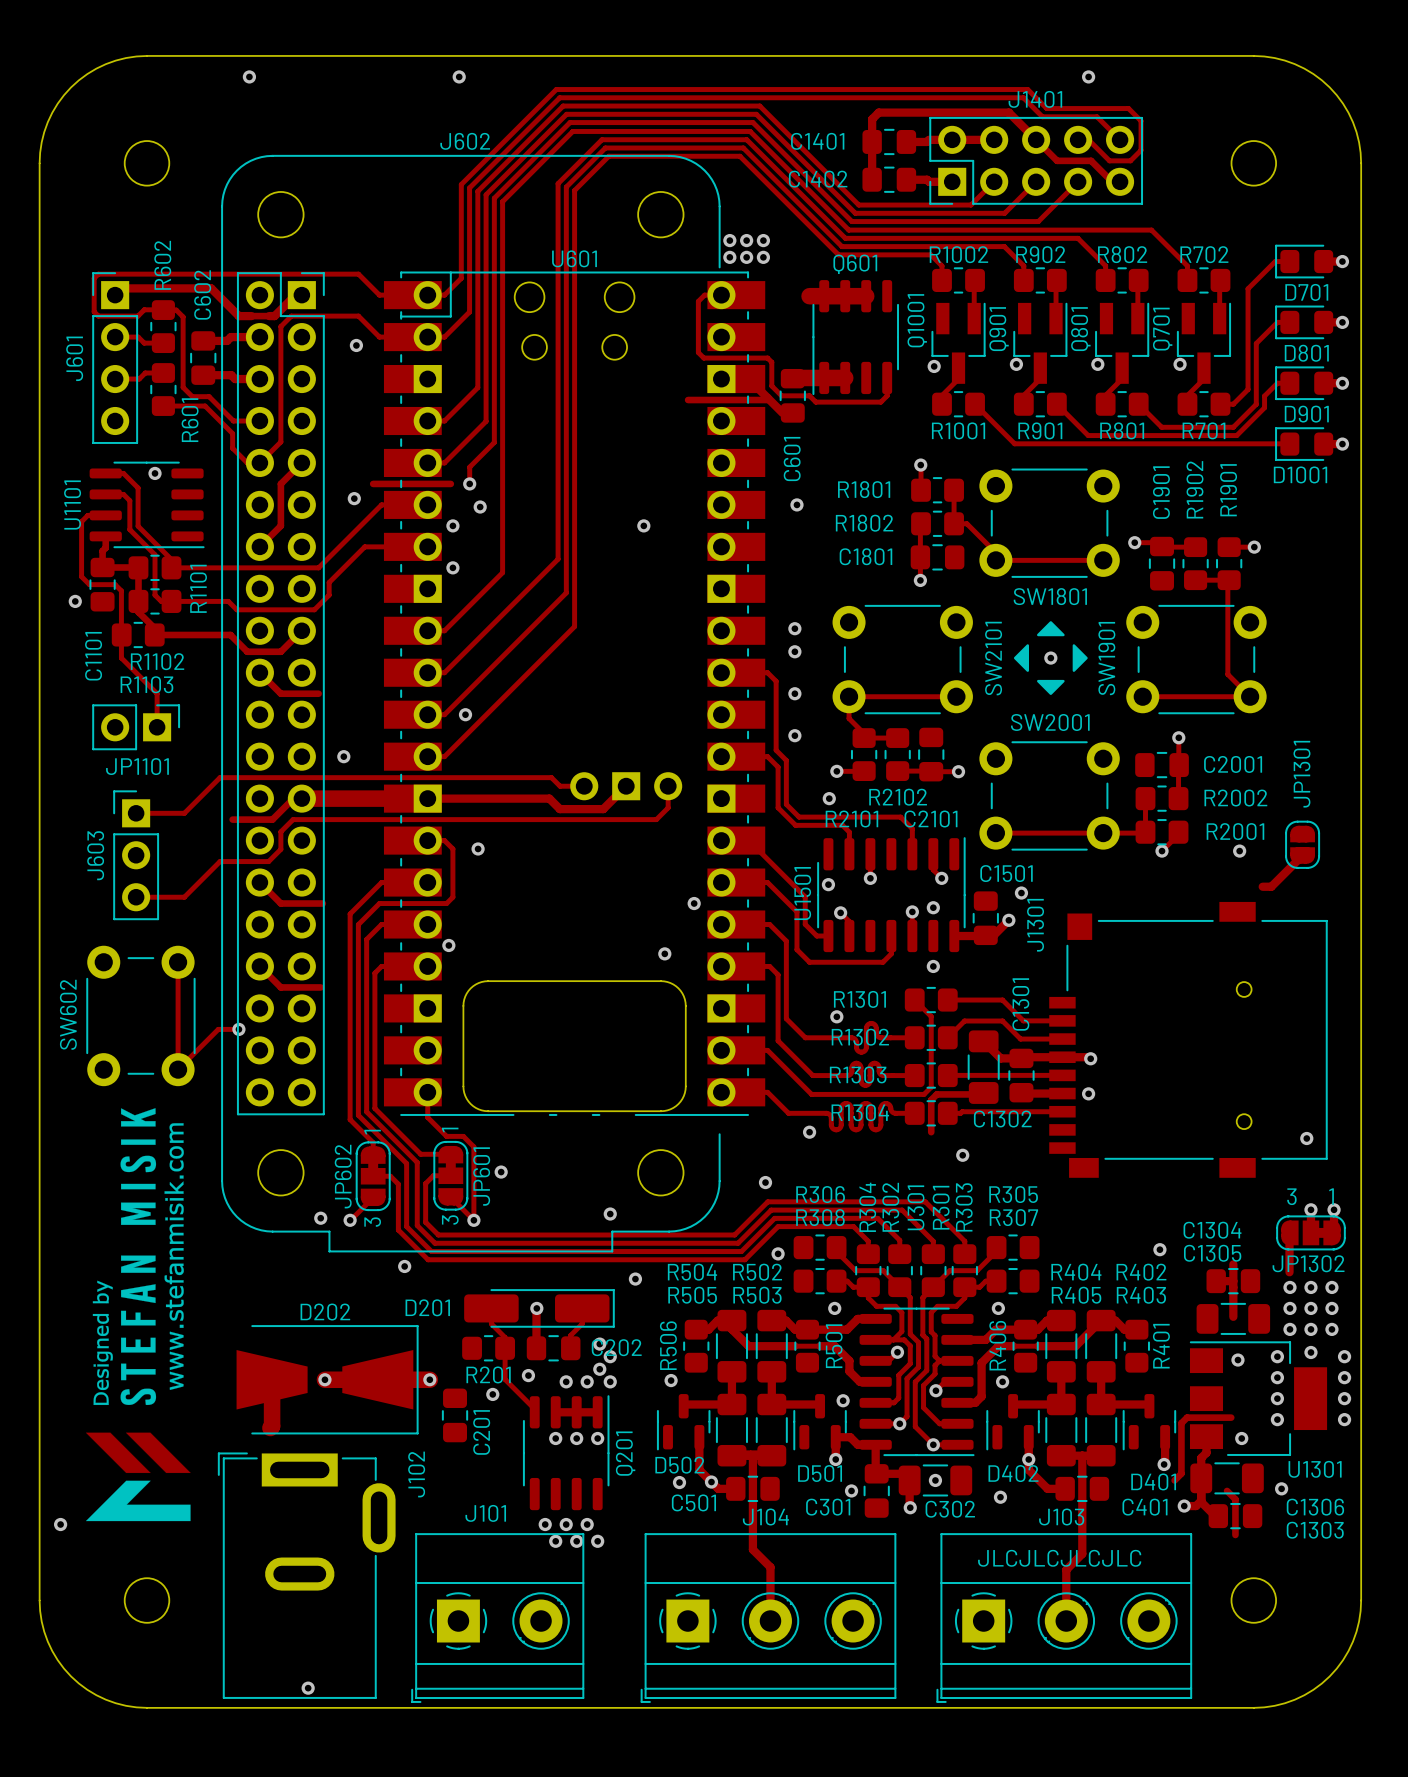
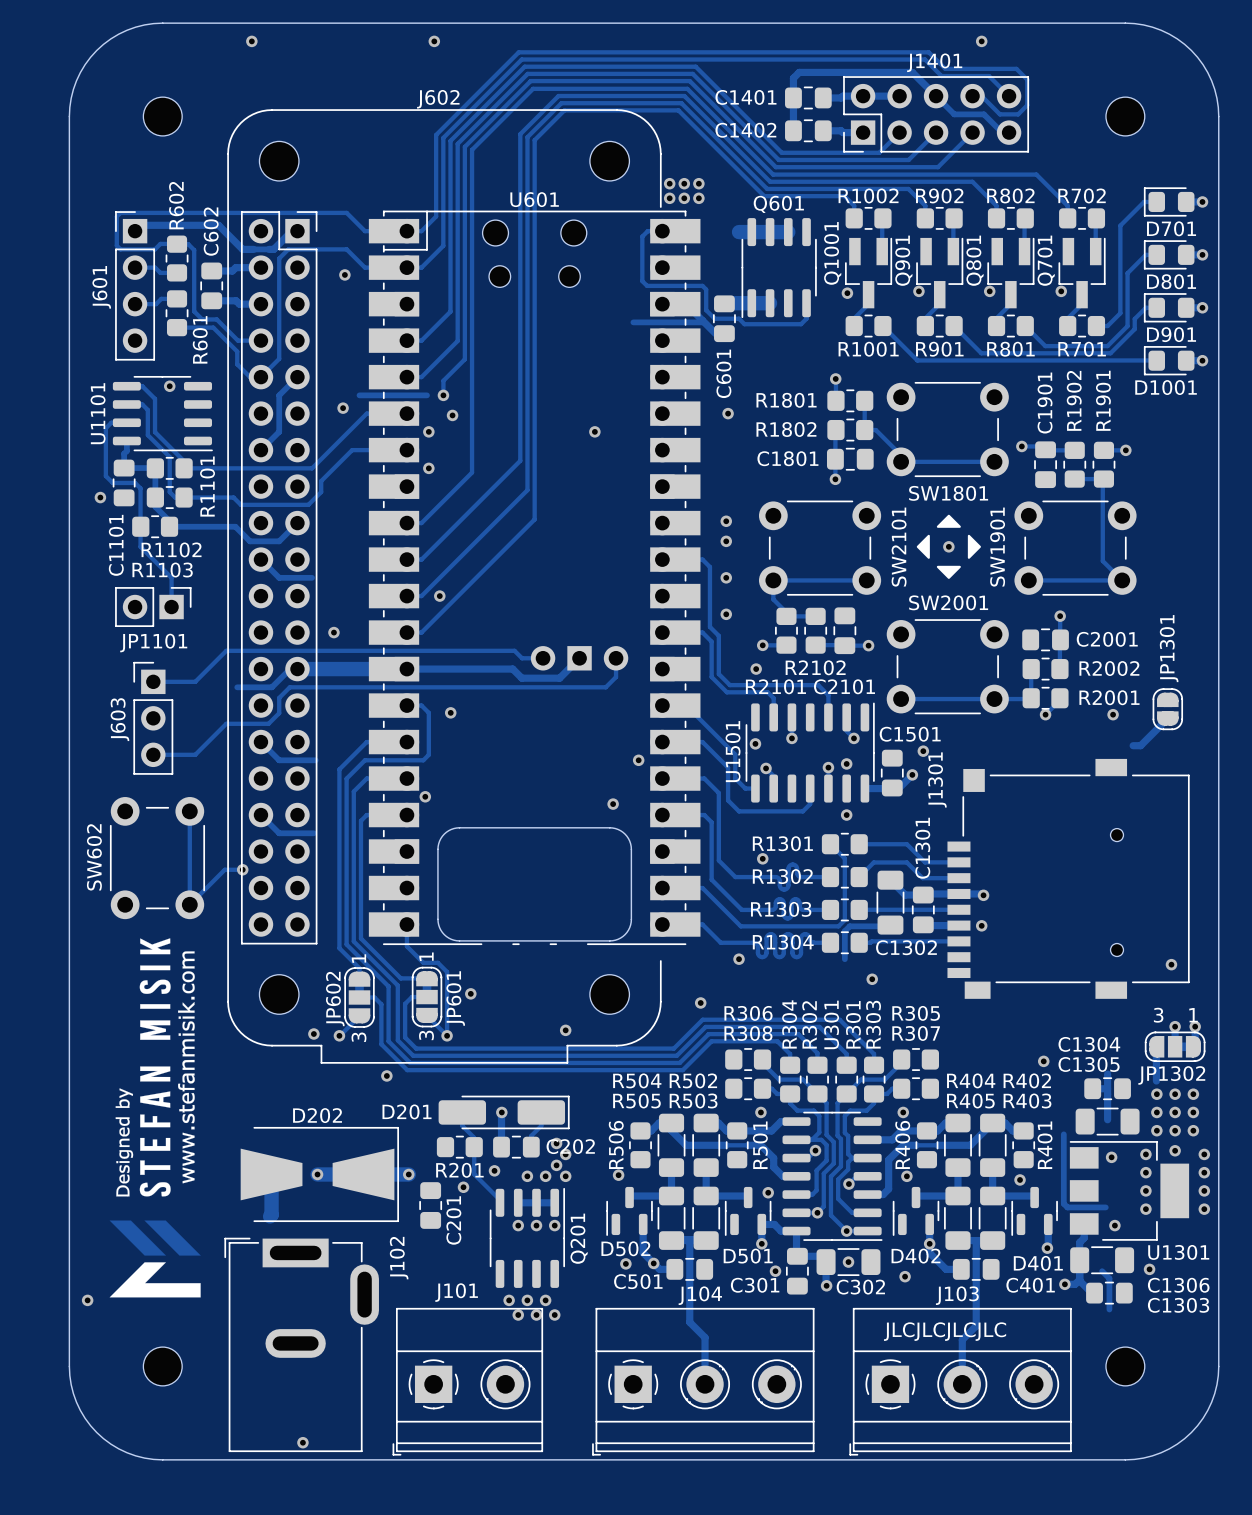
via: (778, 1253) -> none
via: (635, 1279) -> none
via: none -> (1020, 1179)
track: (1187, 1417) (1181, 1423) (1181, 1473) (1174, 1480) -> (1067, 1207) (1063, 1203) (1063, 1134)

